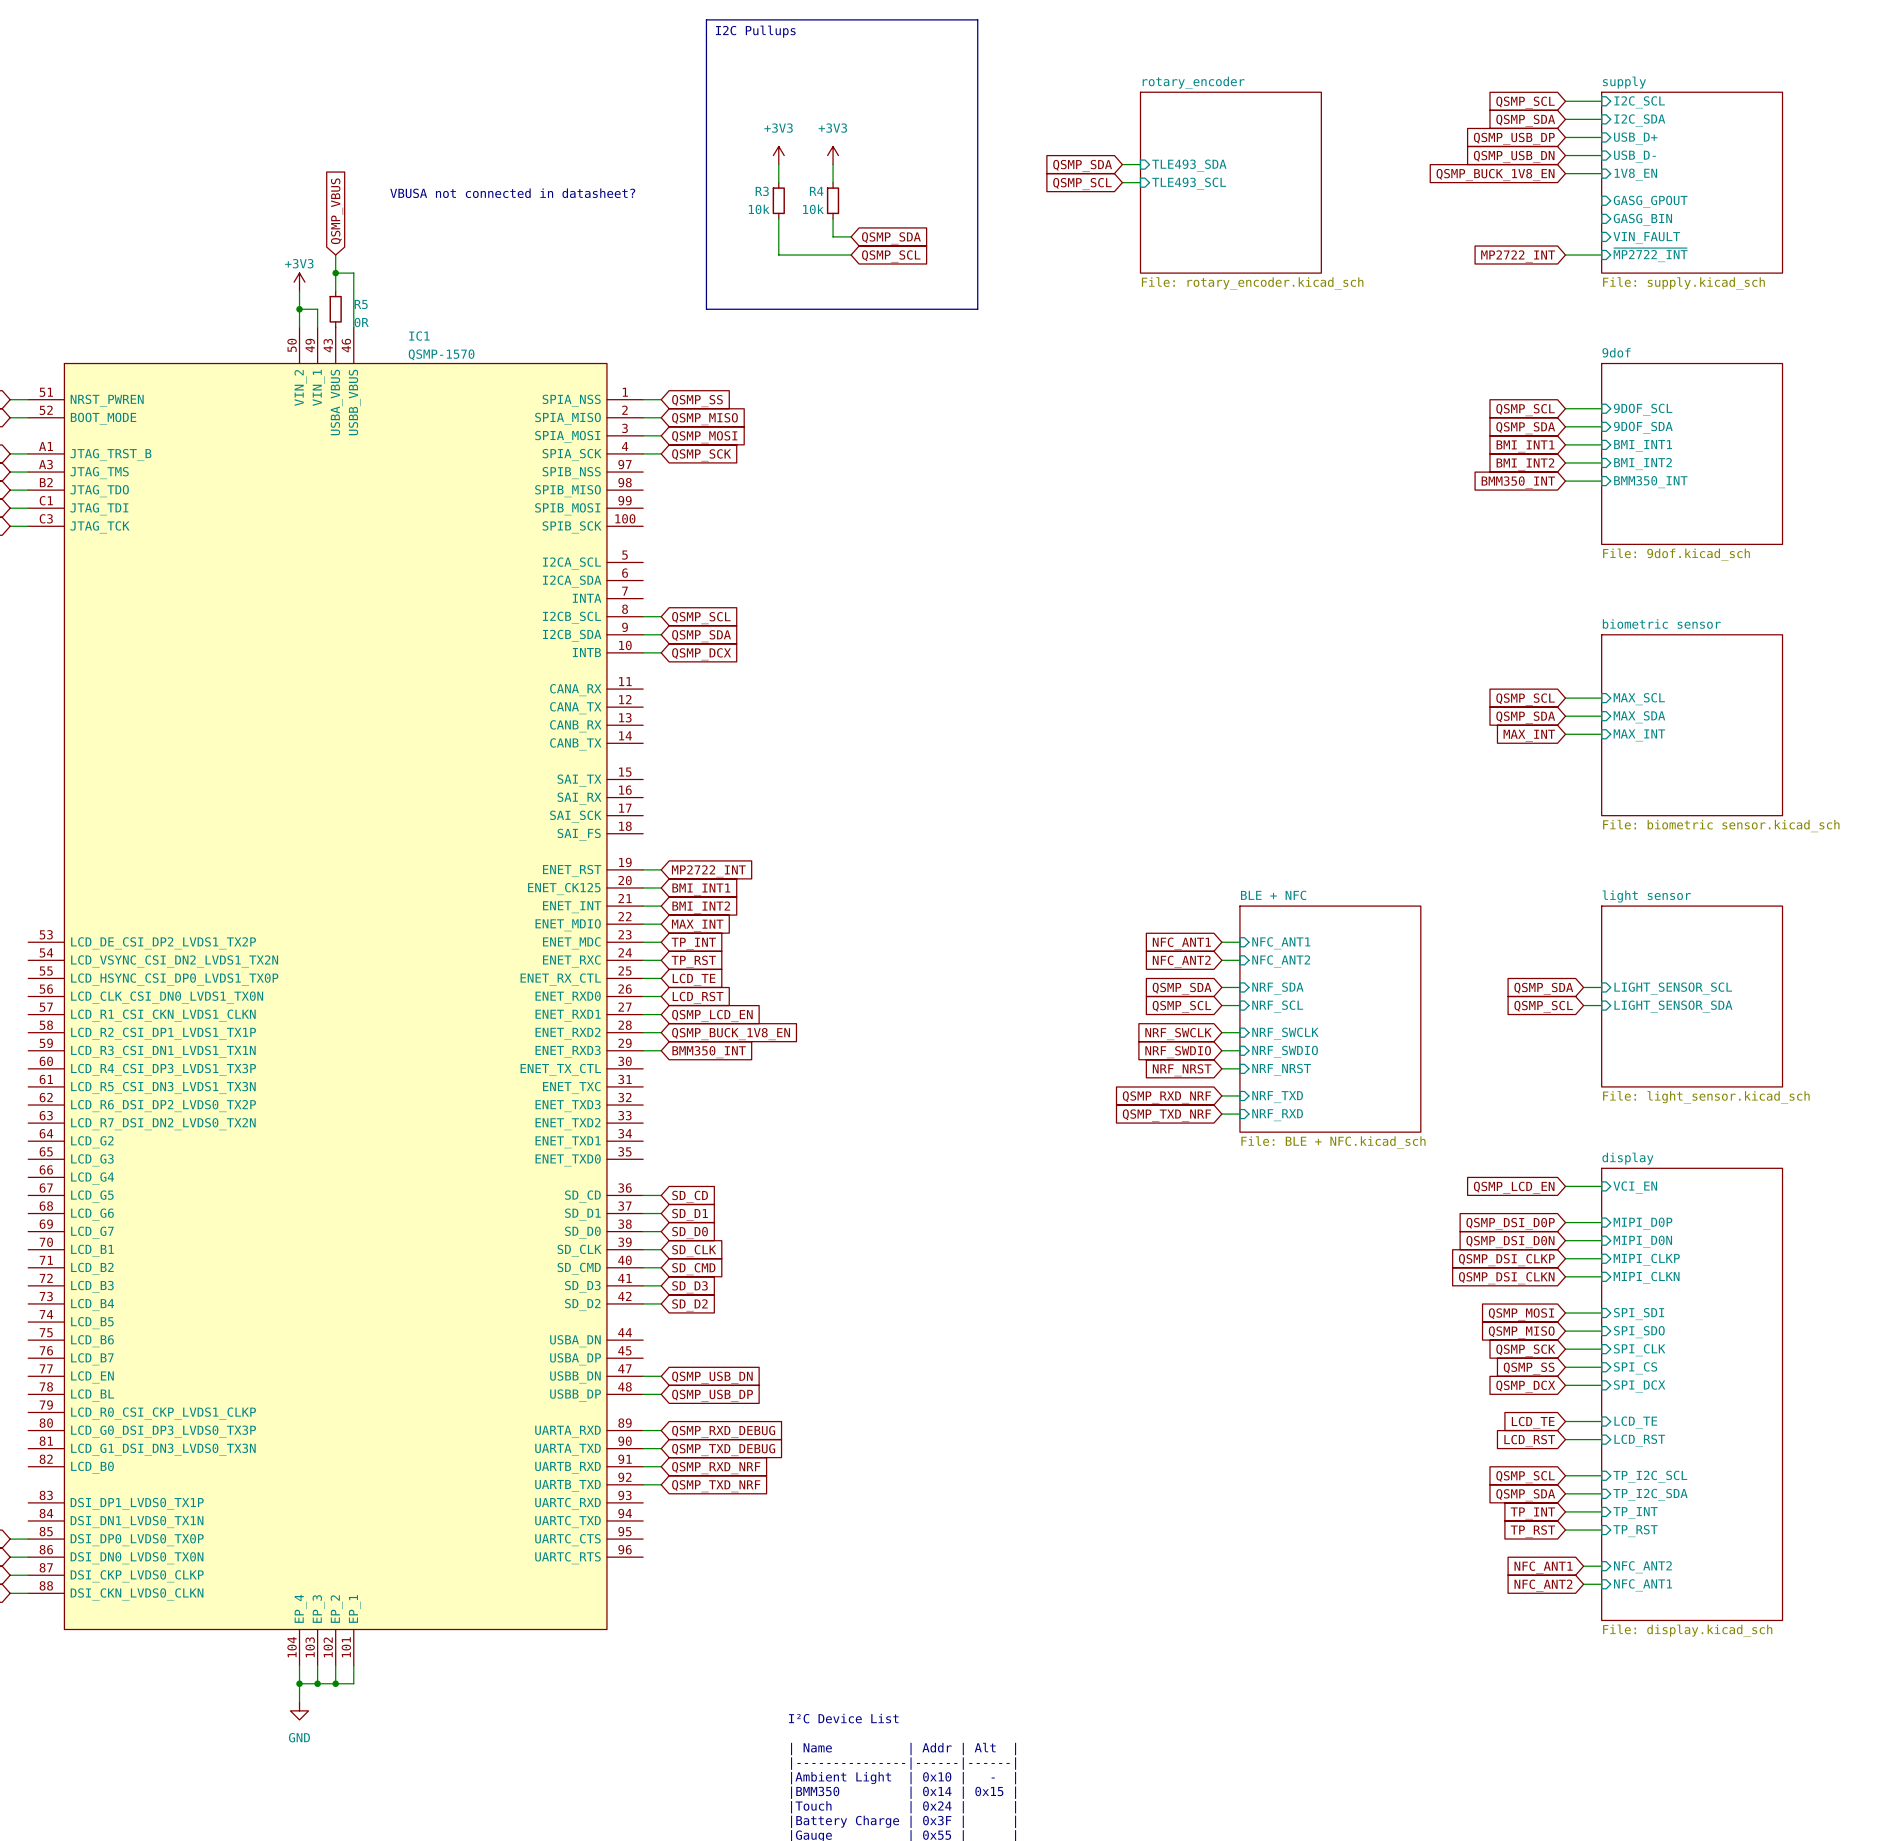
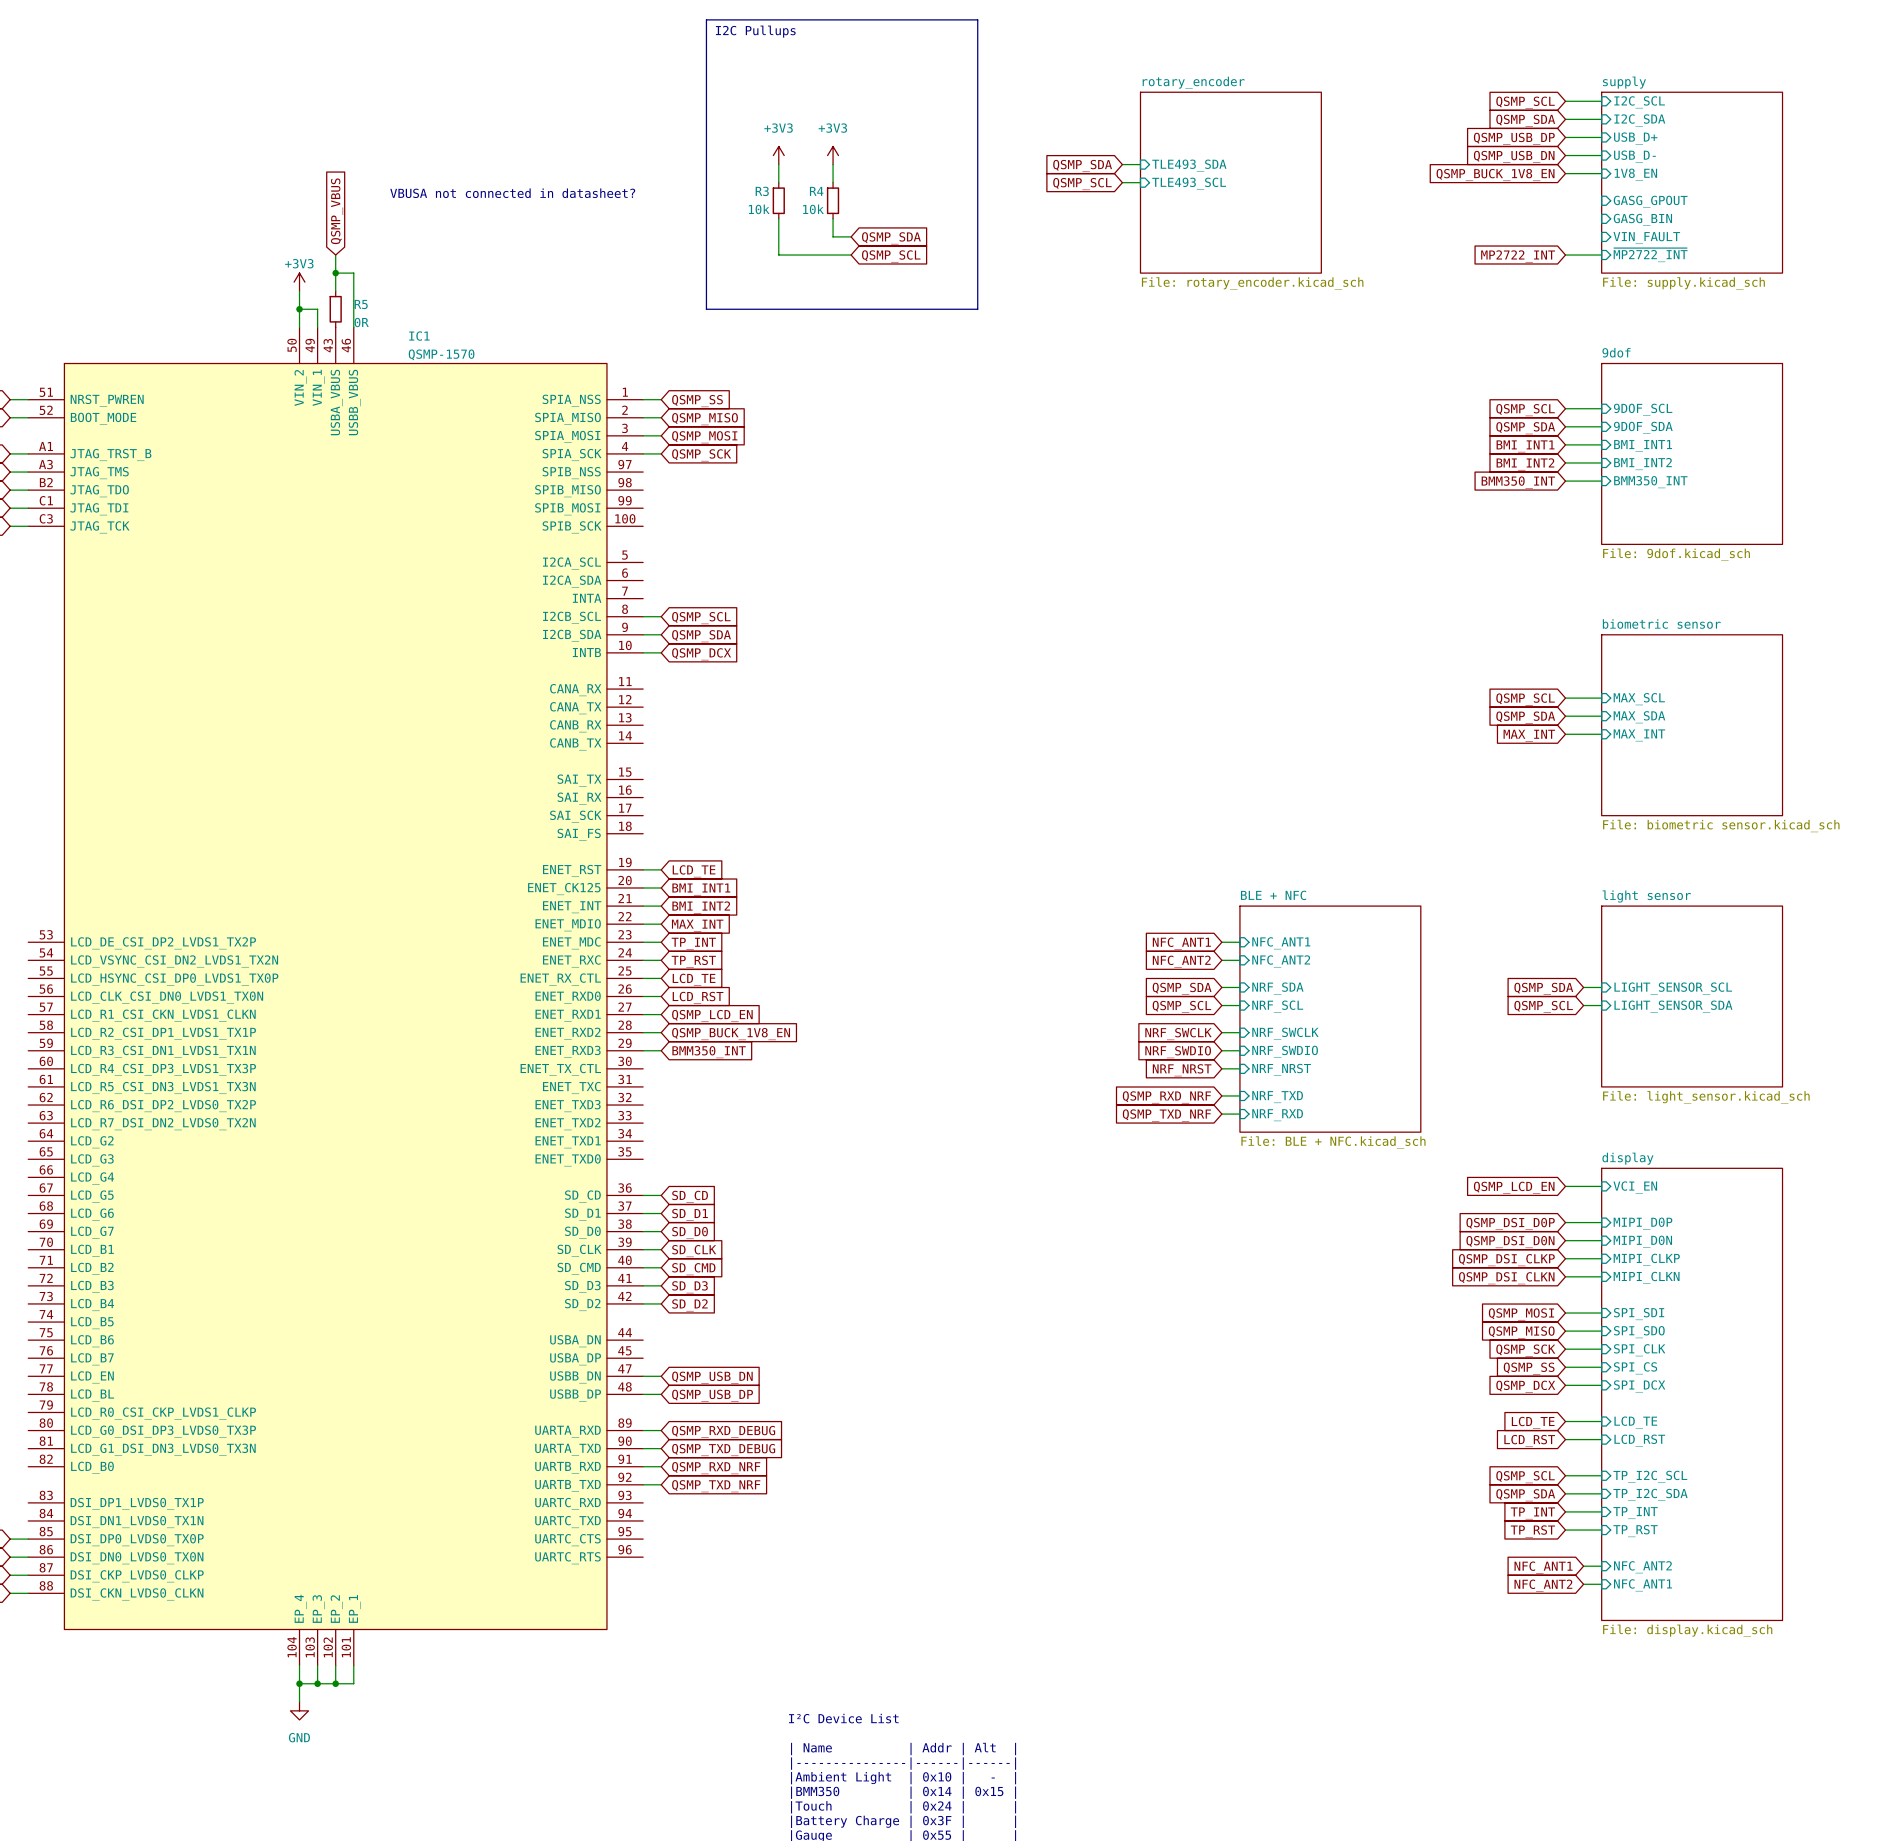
global label: MP2722_INT (708, 871) -> LCD_TE (694, 871)

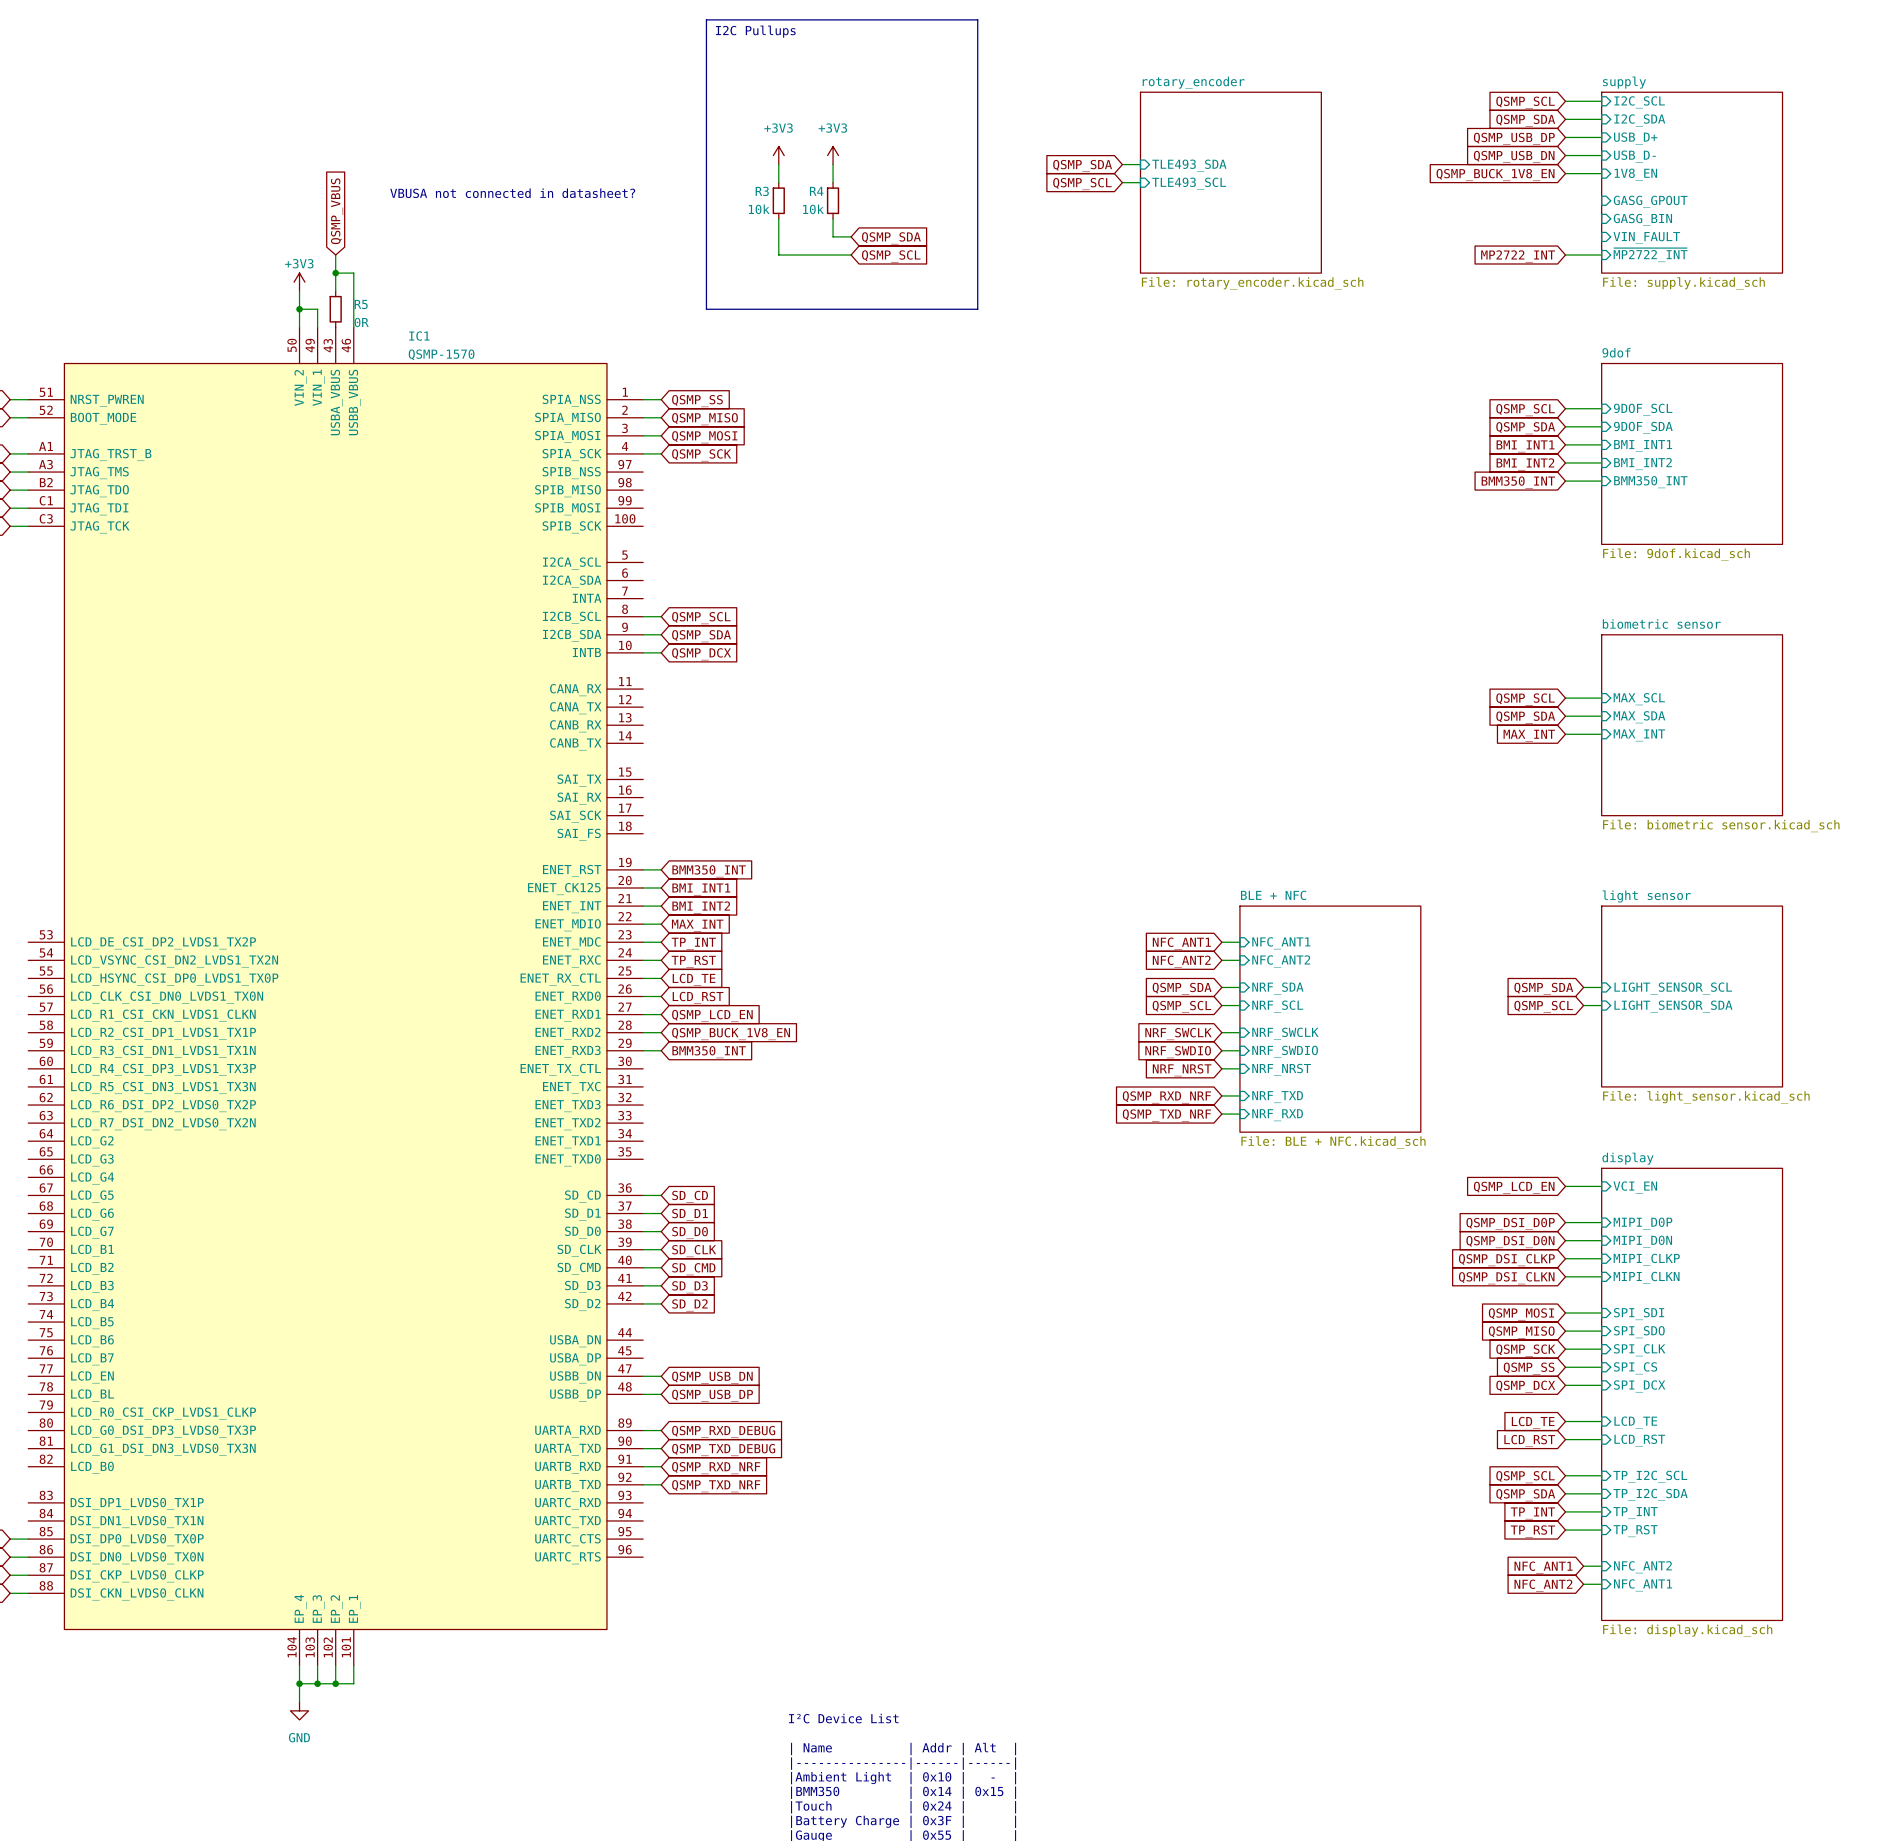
global label: LCD_TE (694, 871) -> BMM350_INT (709, 871)

